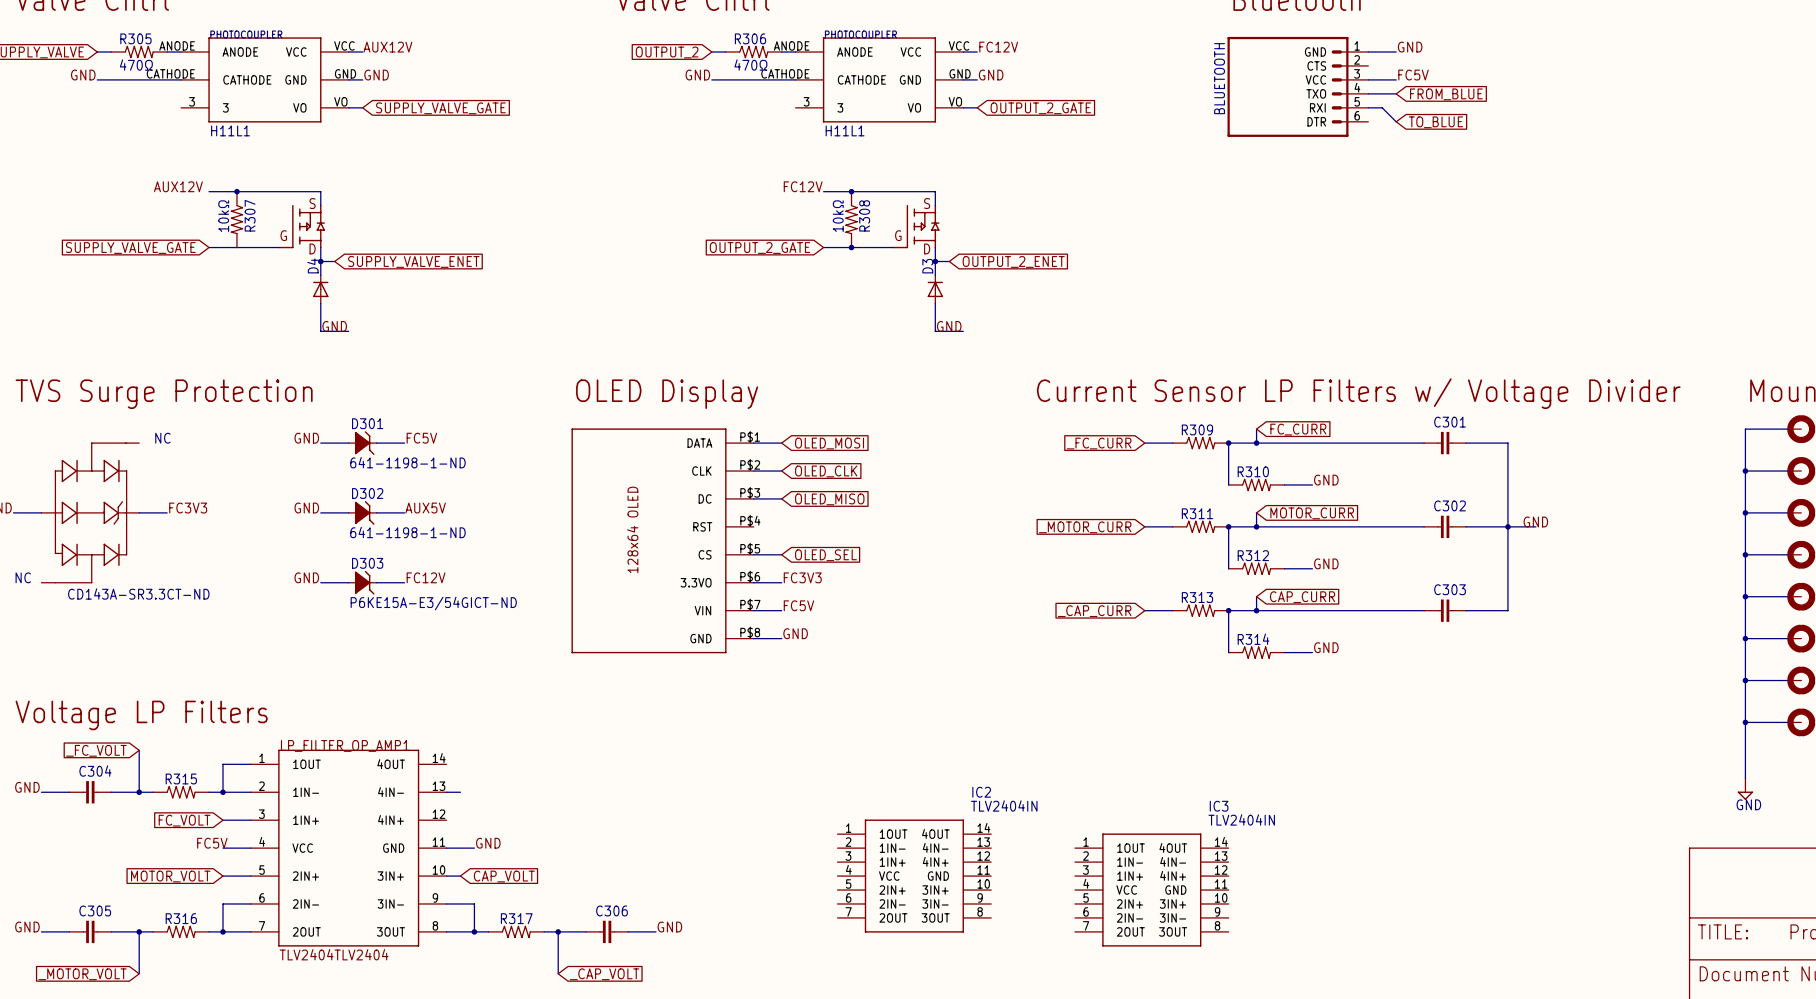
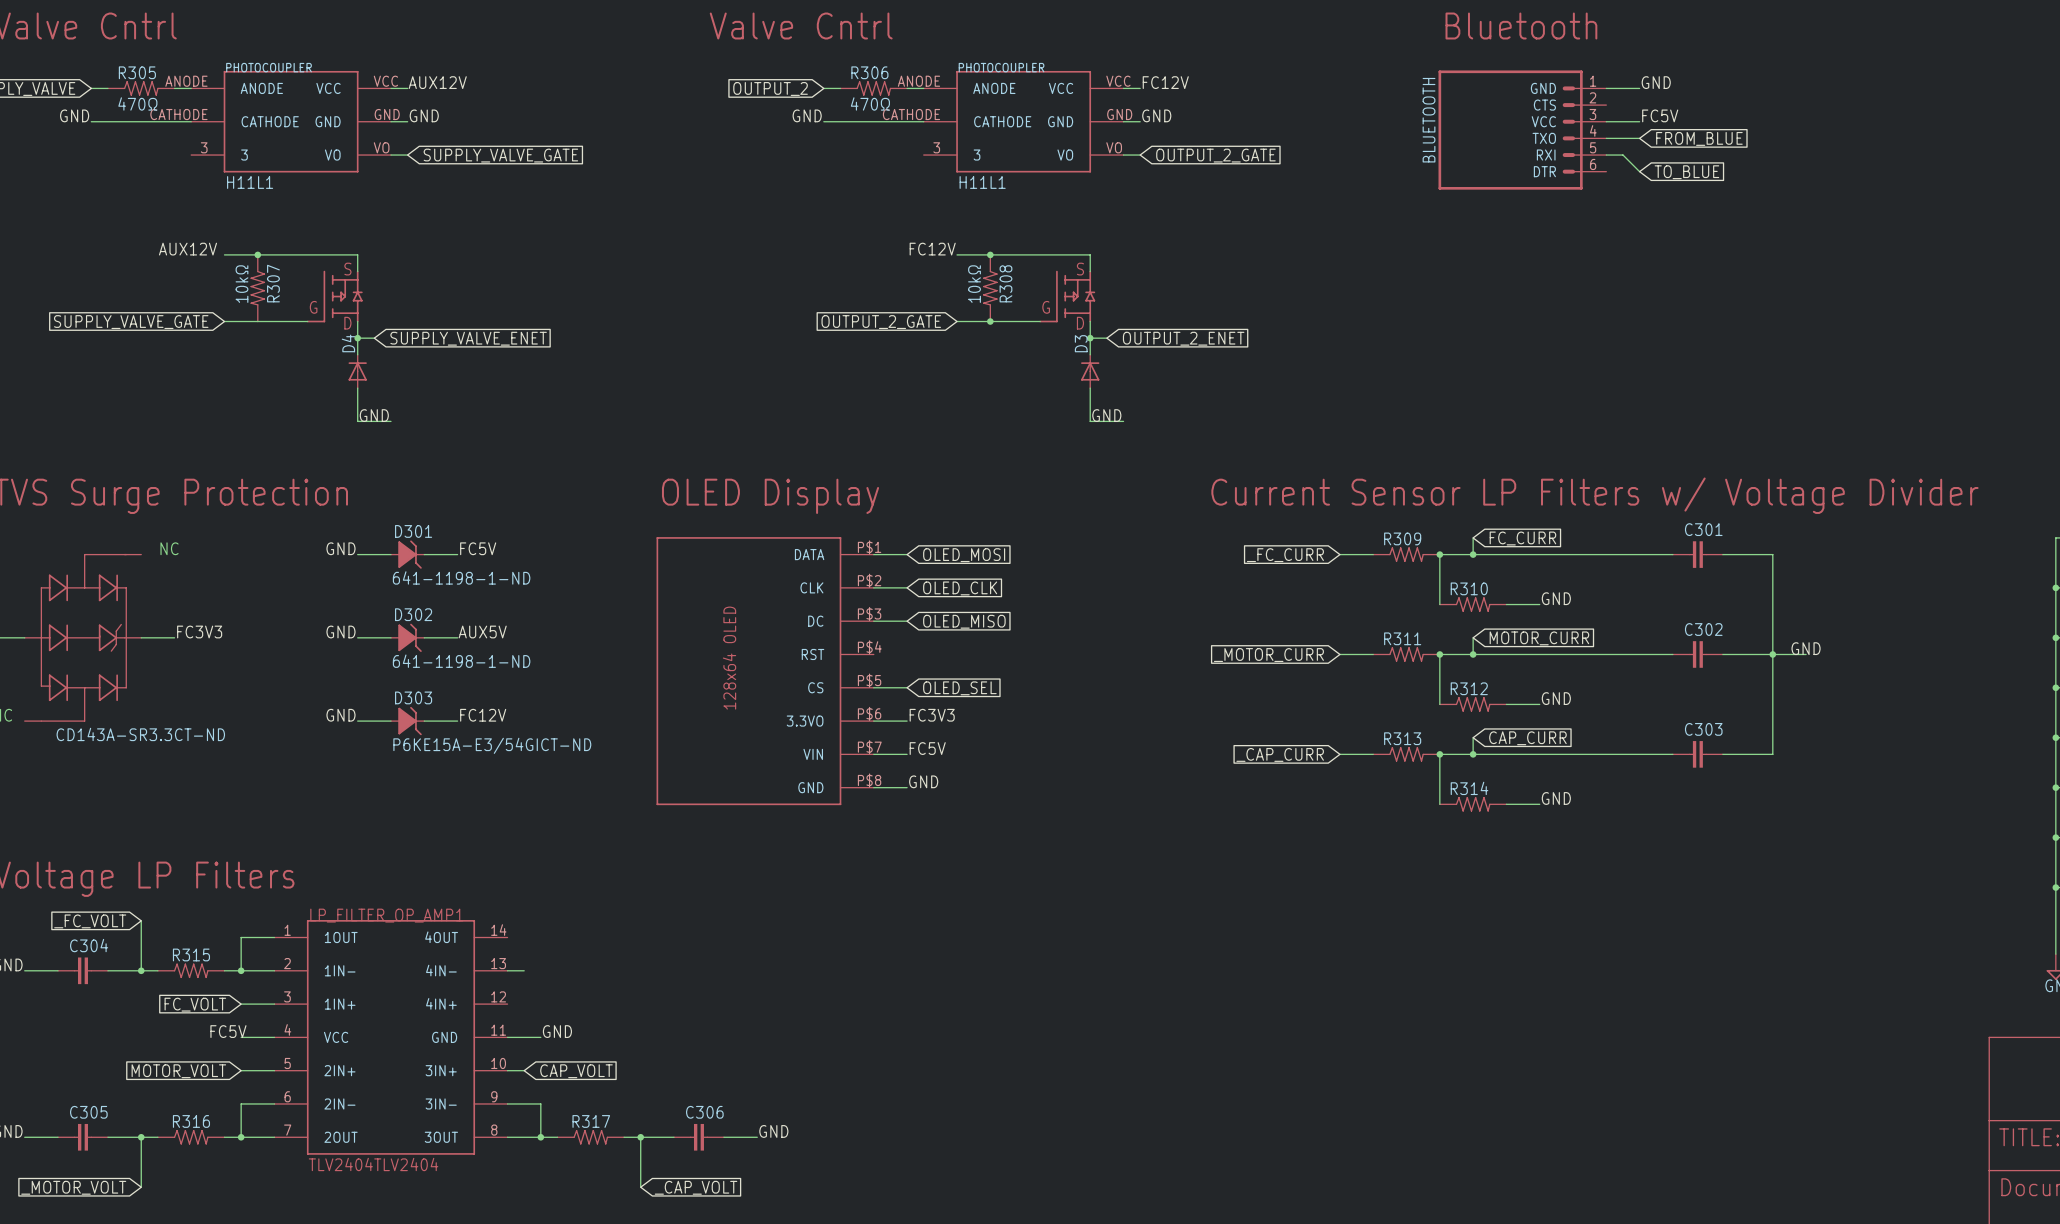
IC2: TLV2404IN (914, 876) -> none
IC3: TLV2404IN (1151, 890) -> none

